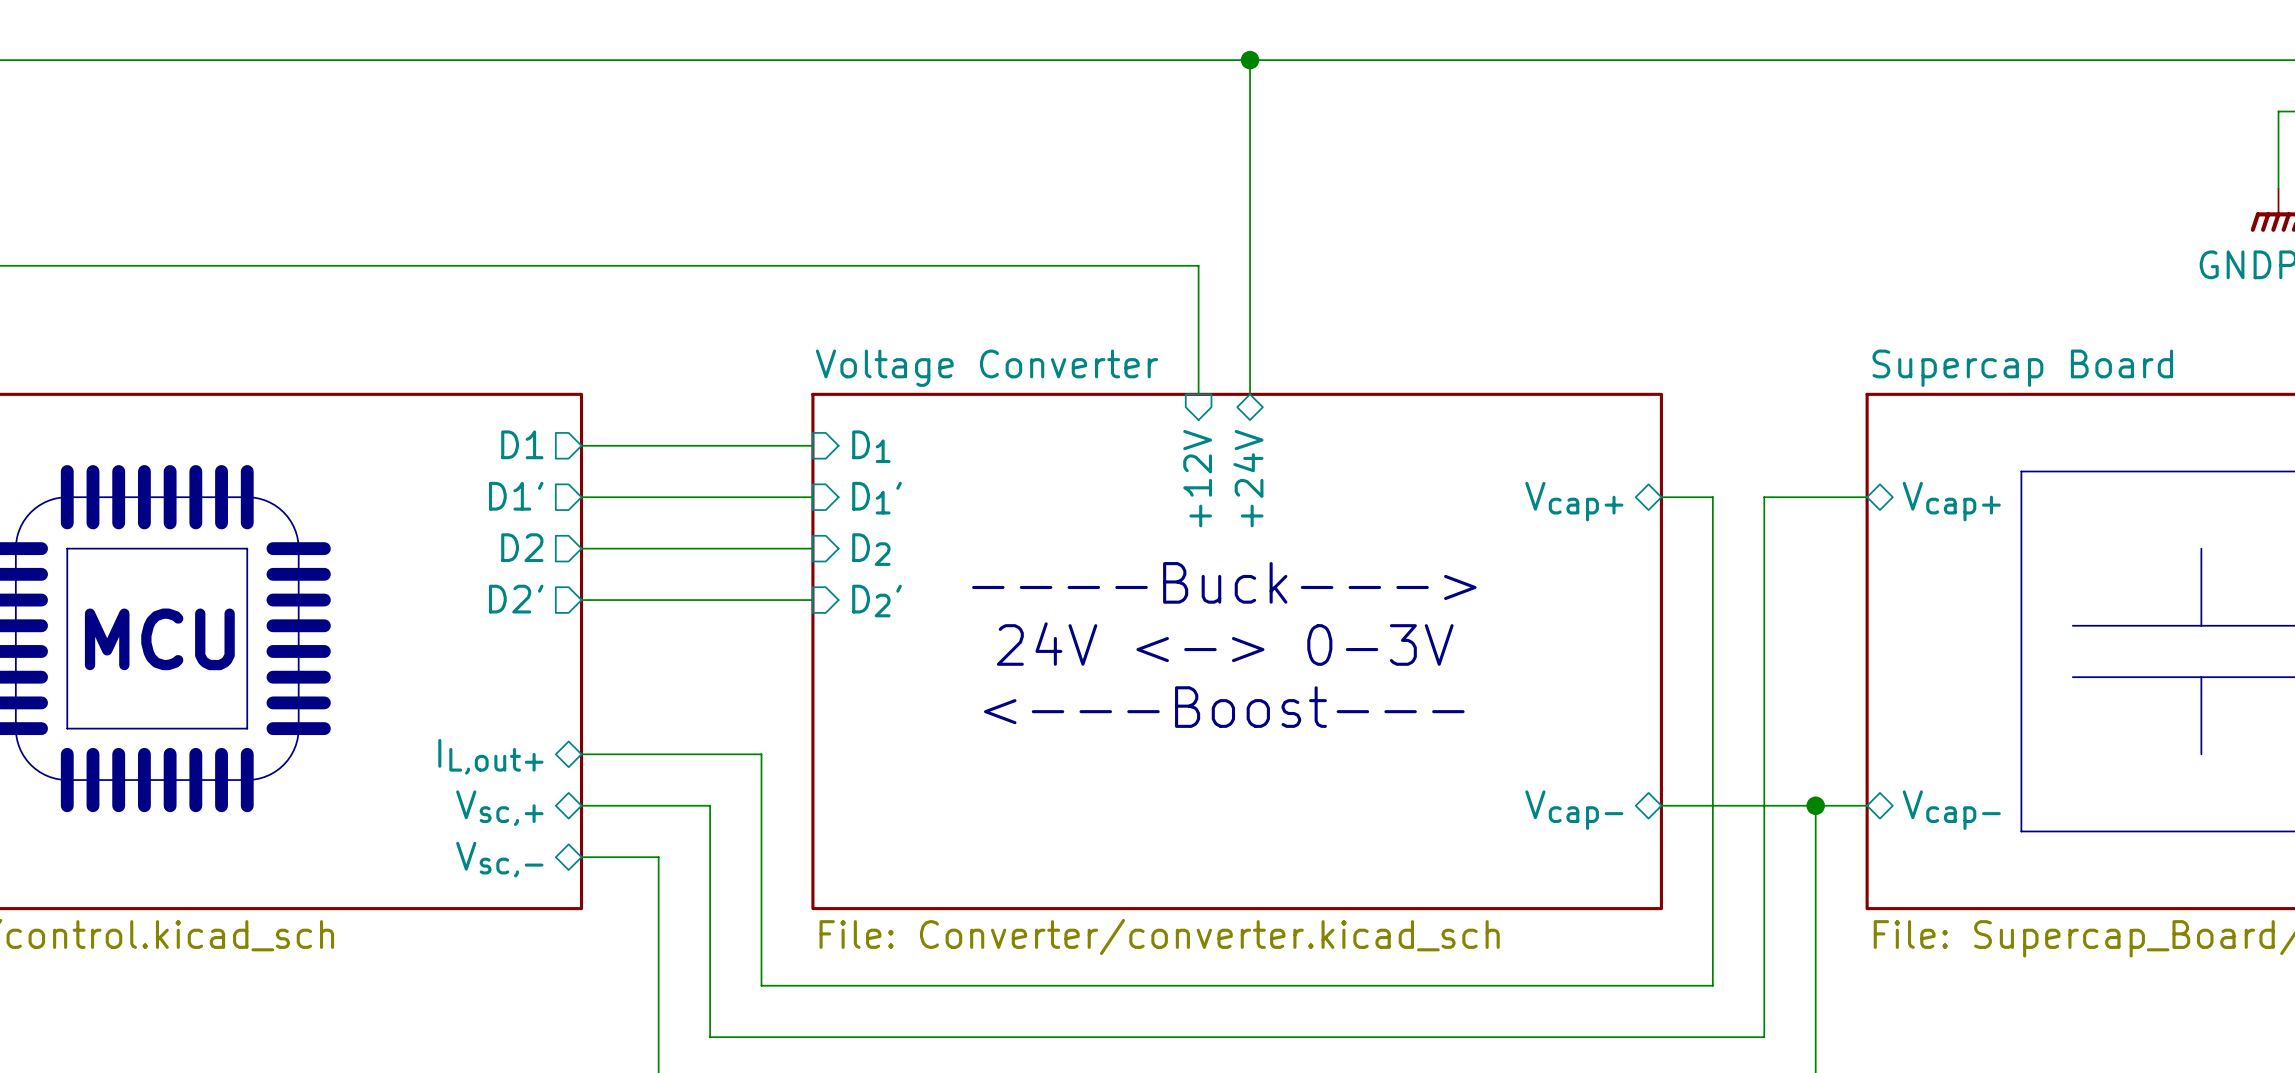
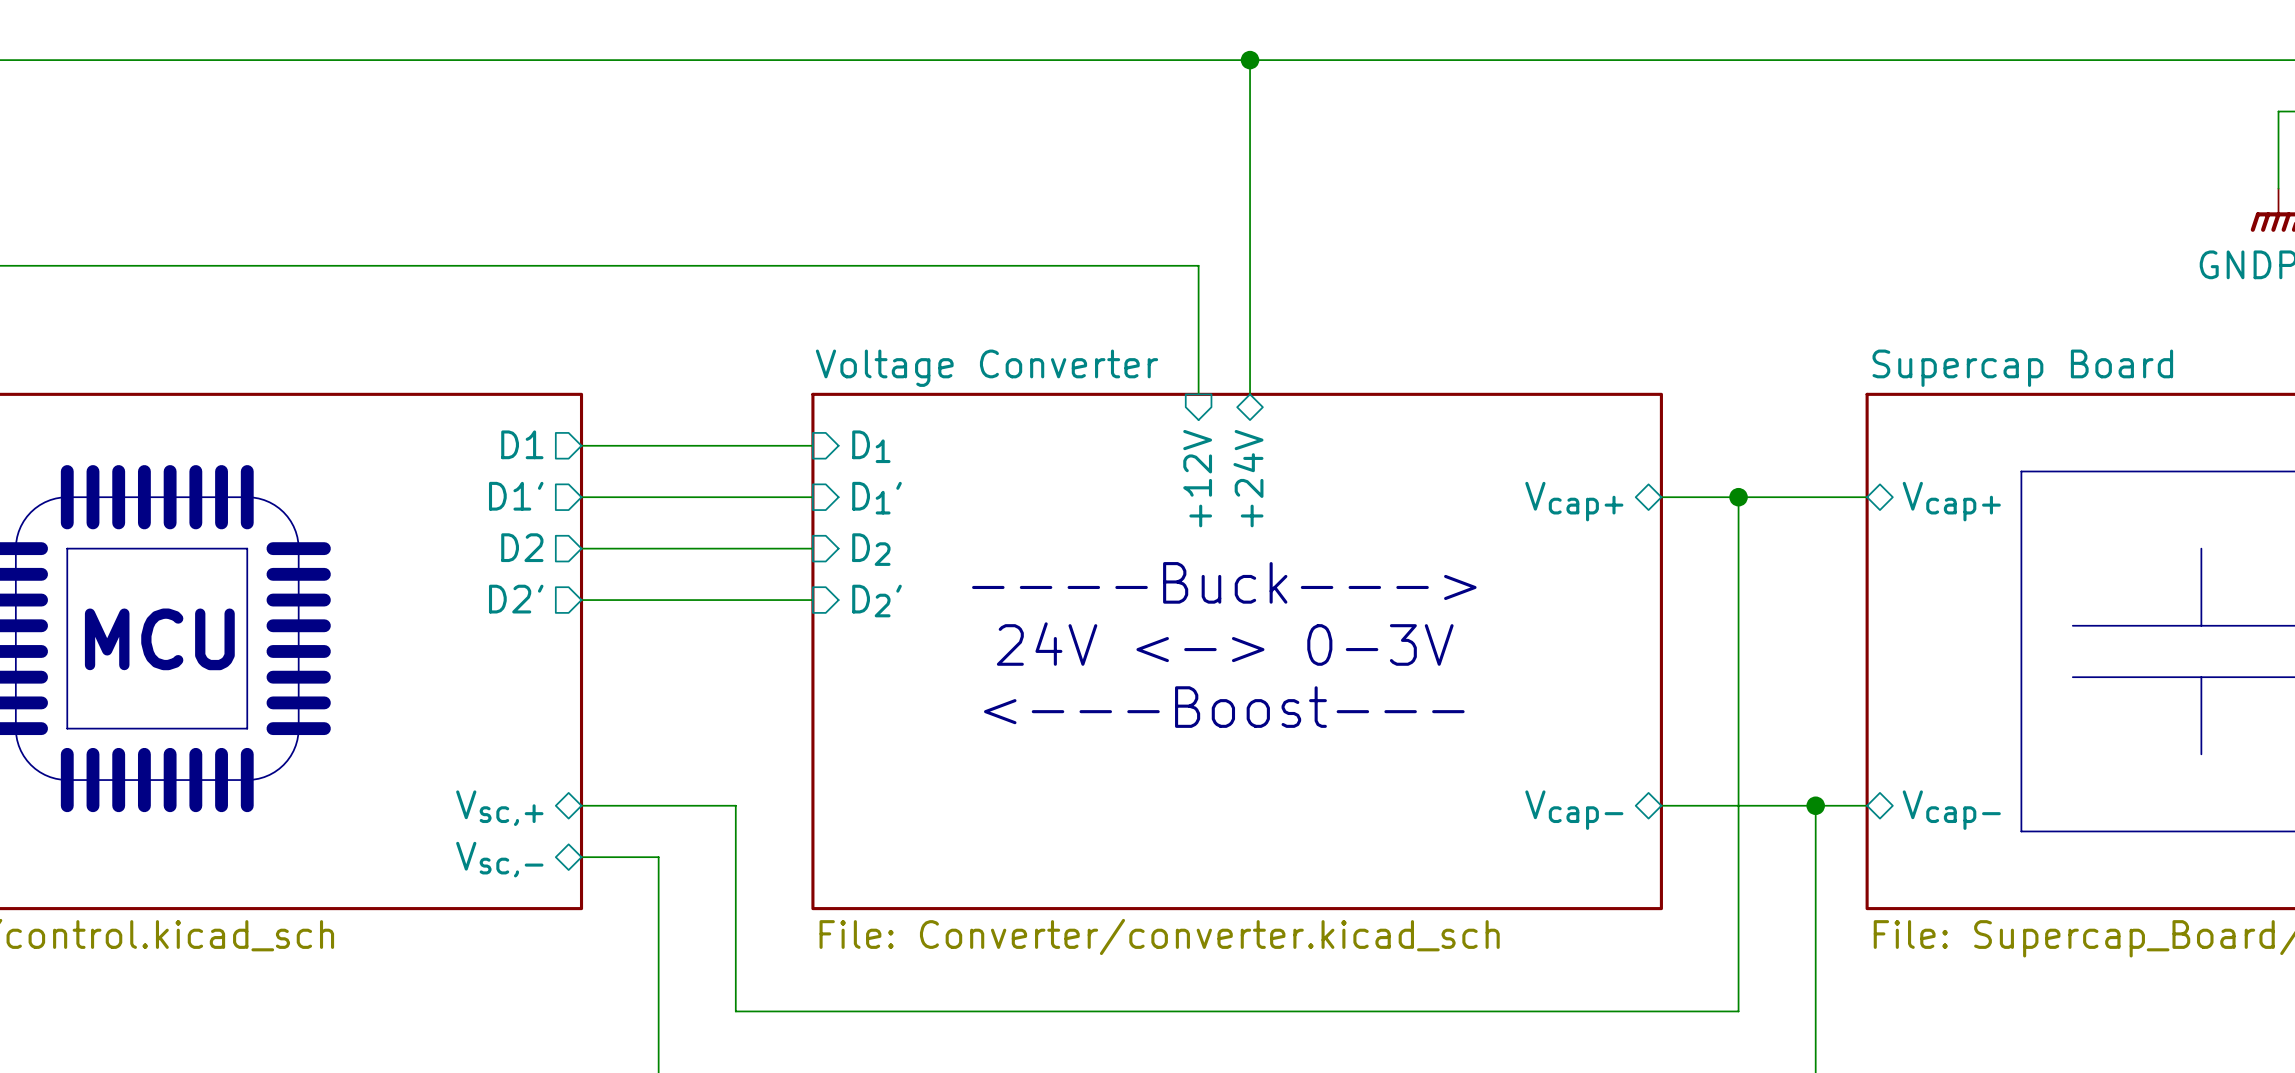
wire: (1712, 497) (1712, 985) (761, 985) (761, 754) (581, 754) -> (1712, 497) (1764, 497)
junction: none -> (1738, 497)
wire: (1764, 497) (1764, 1037) (710, 1037) (710, 805) -> (1738, 497) (1738, 1011) (735, 1011) (735, 805) (710, 805)
sheet pin: IL,out+ (490, 756) -> none

